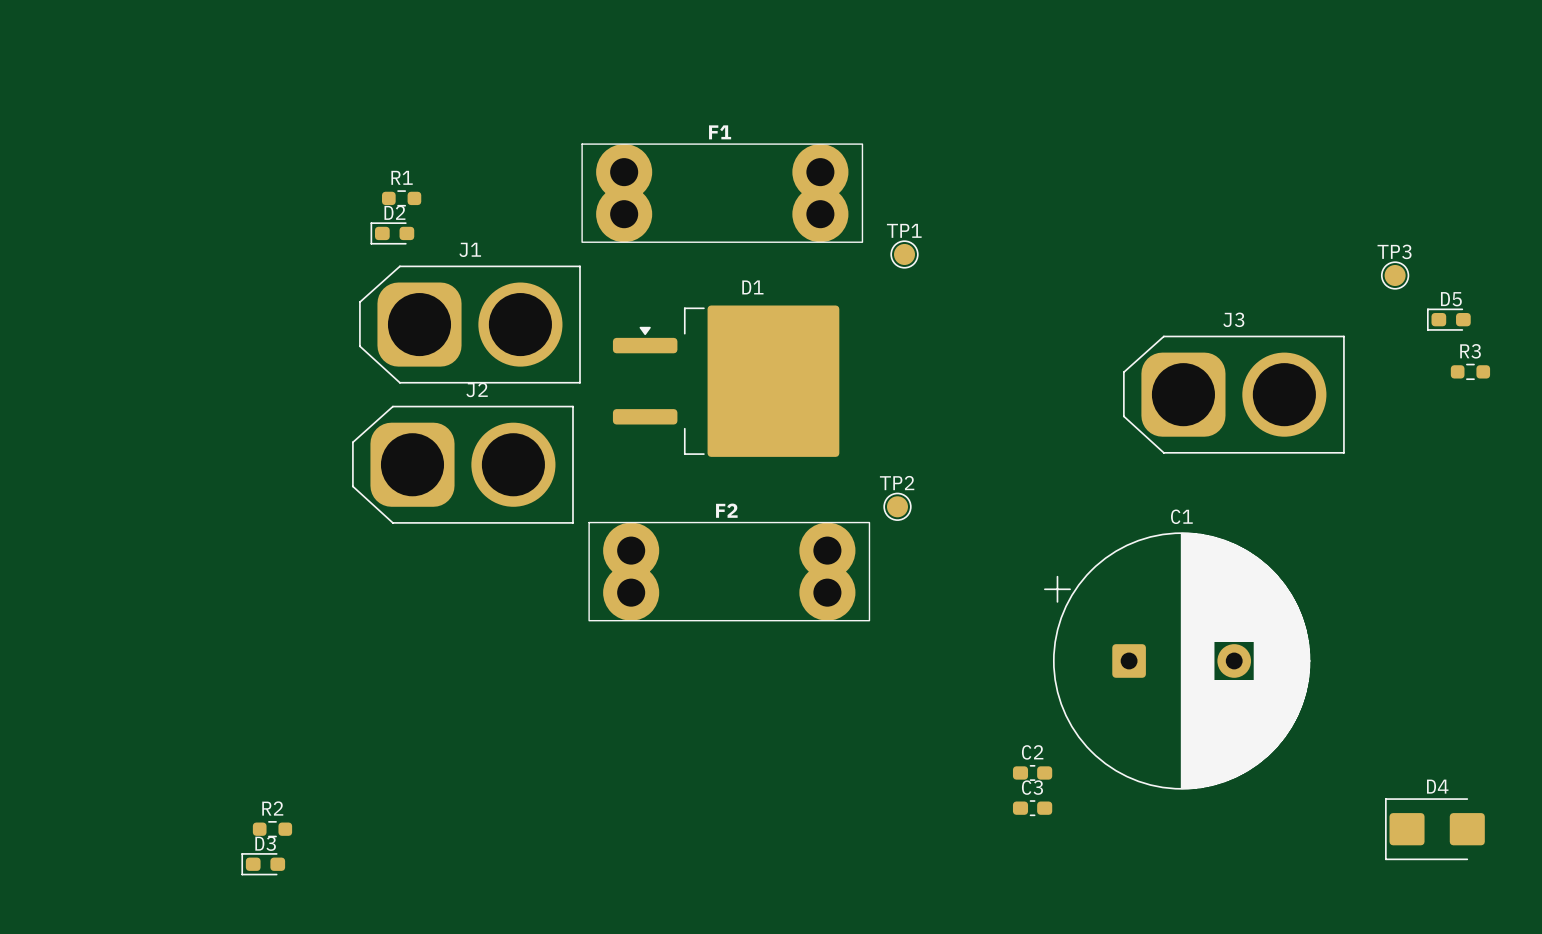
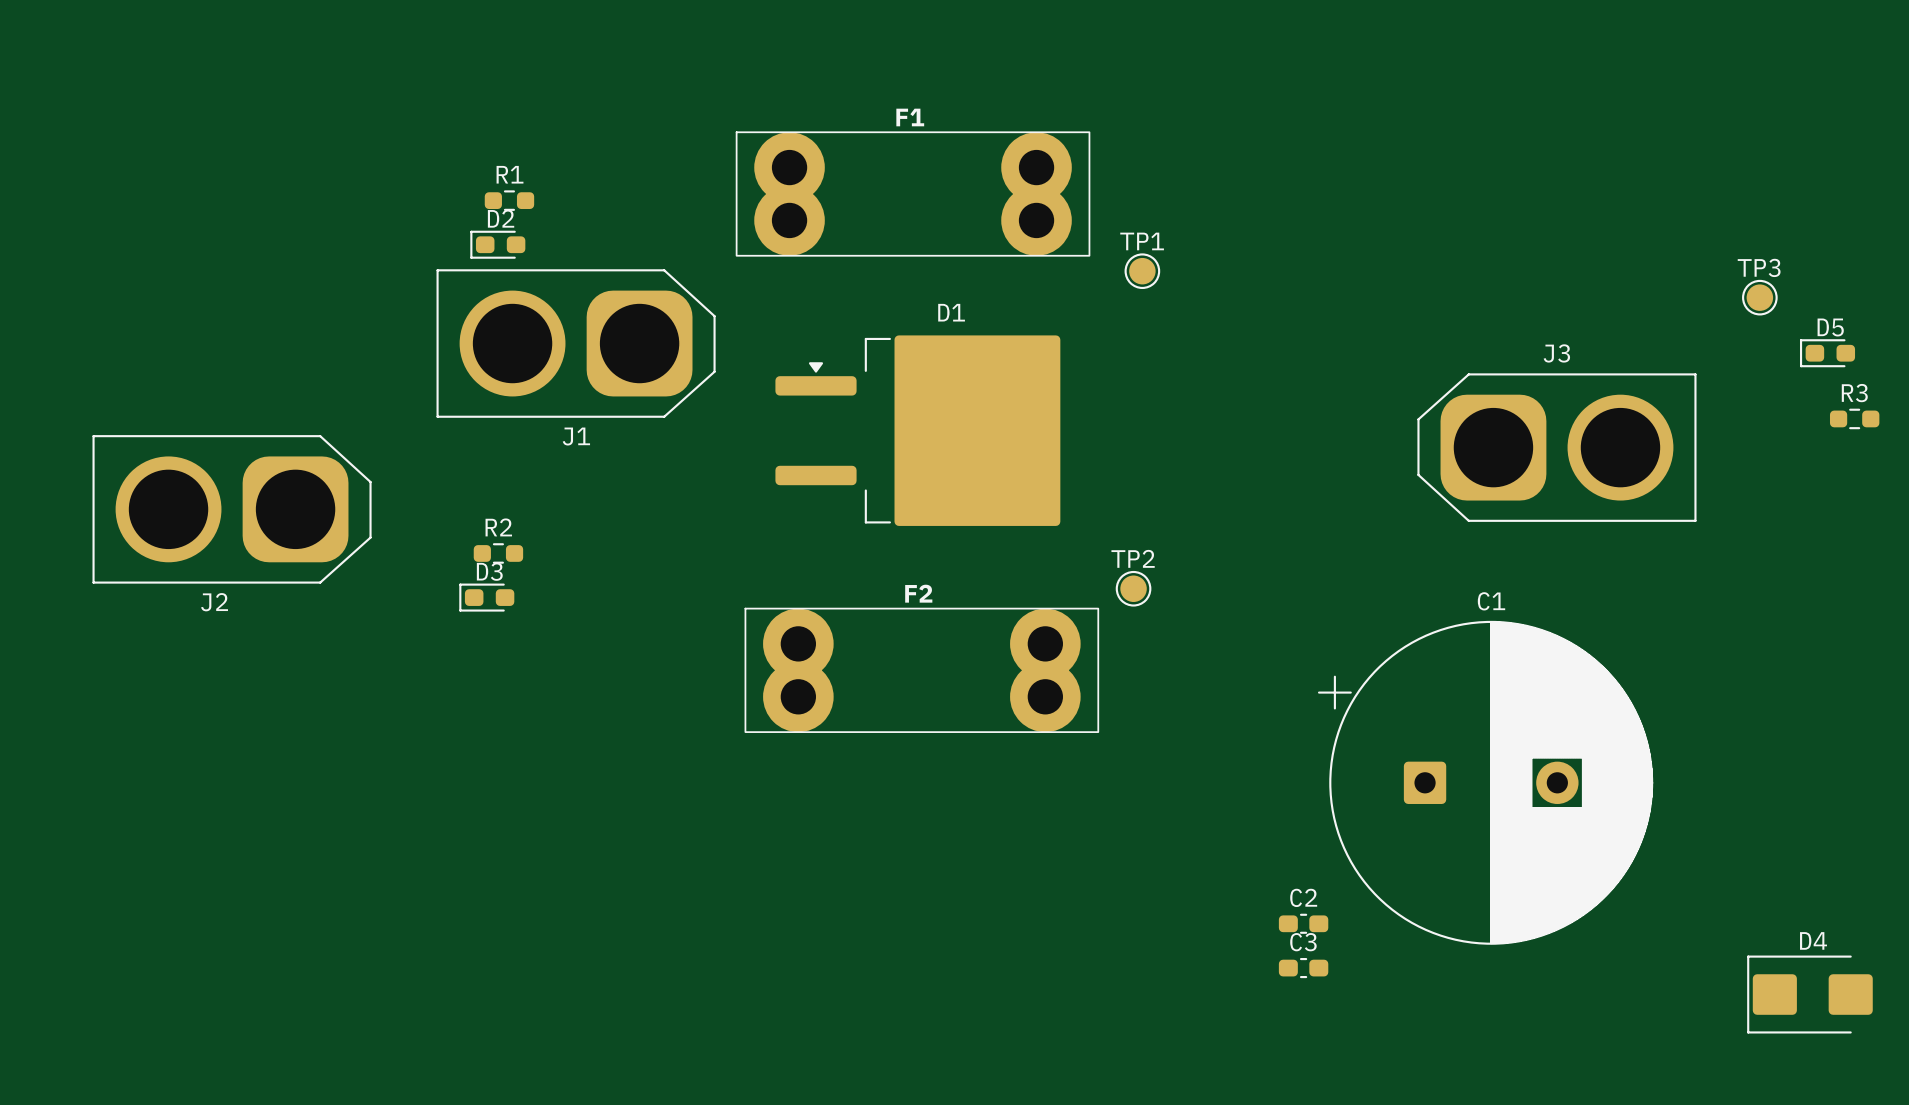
J1 rotation: 0° (469, 324) -> 180° (576, 343)
J2 rotation: 0° (462, 464) -> 180° (232, 509)
J2 position: (462, 464) -> (232, 509)
R2 position: (272, 829) -> (498, 553)
D3 position: (263, 864) -> (486, 597)

